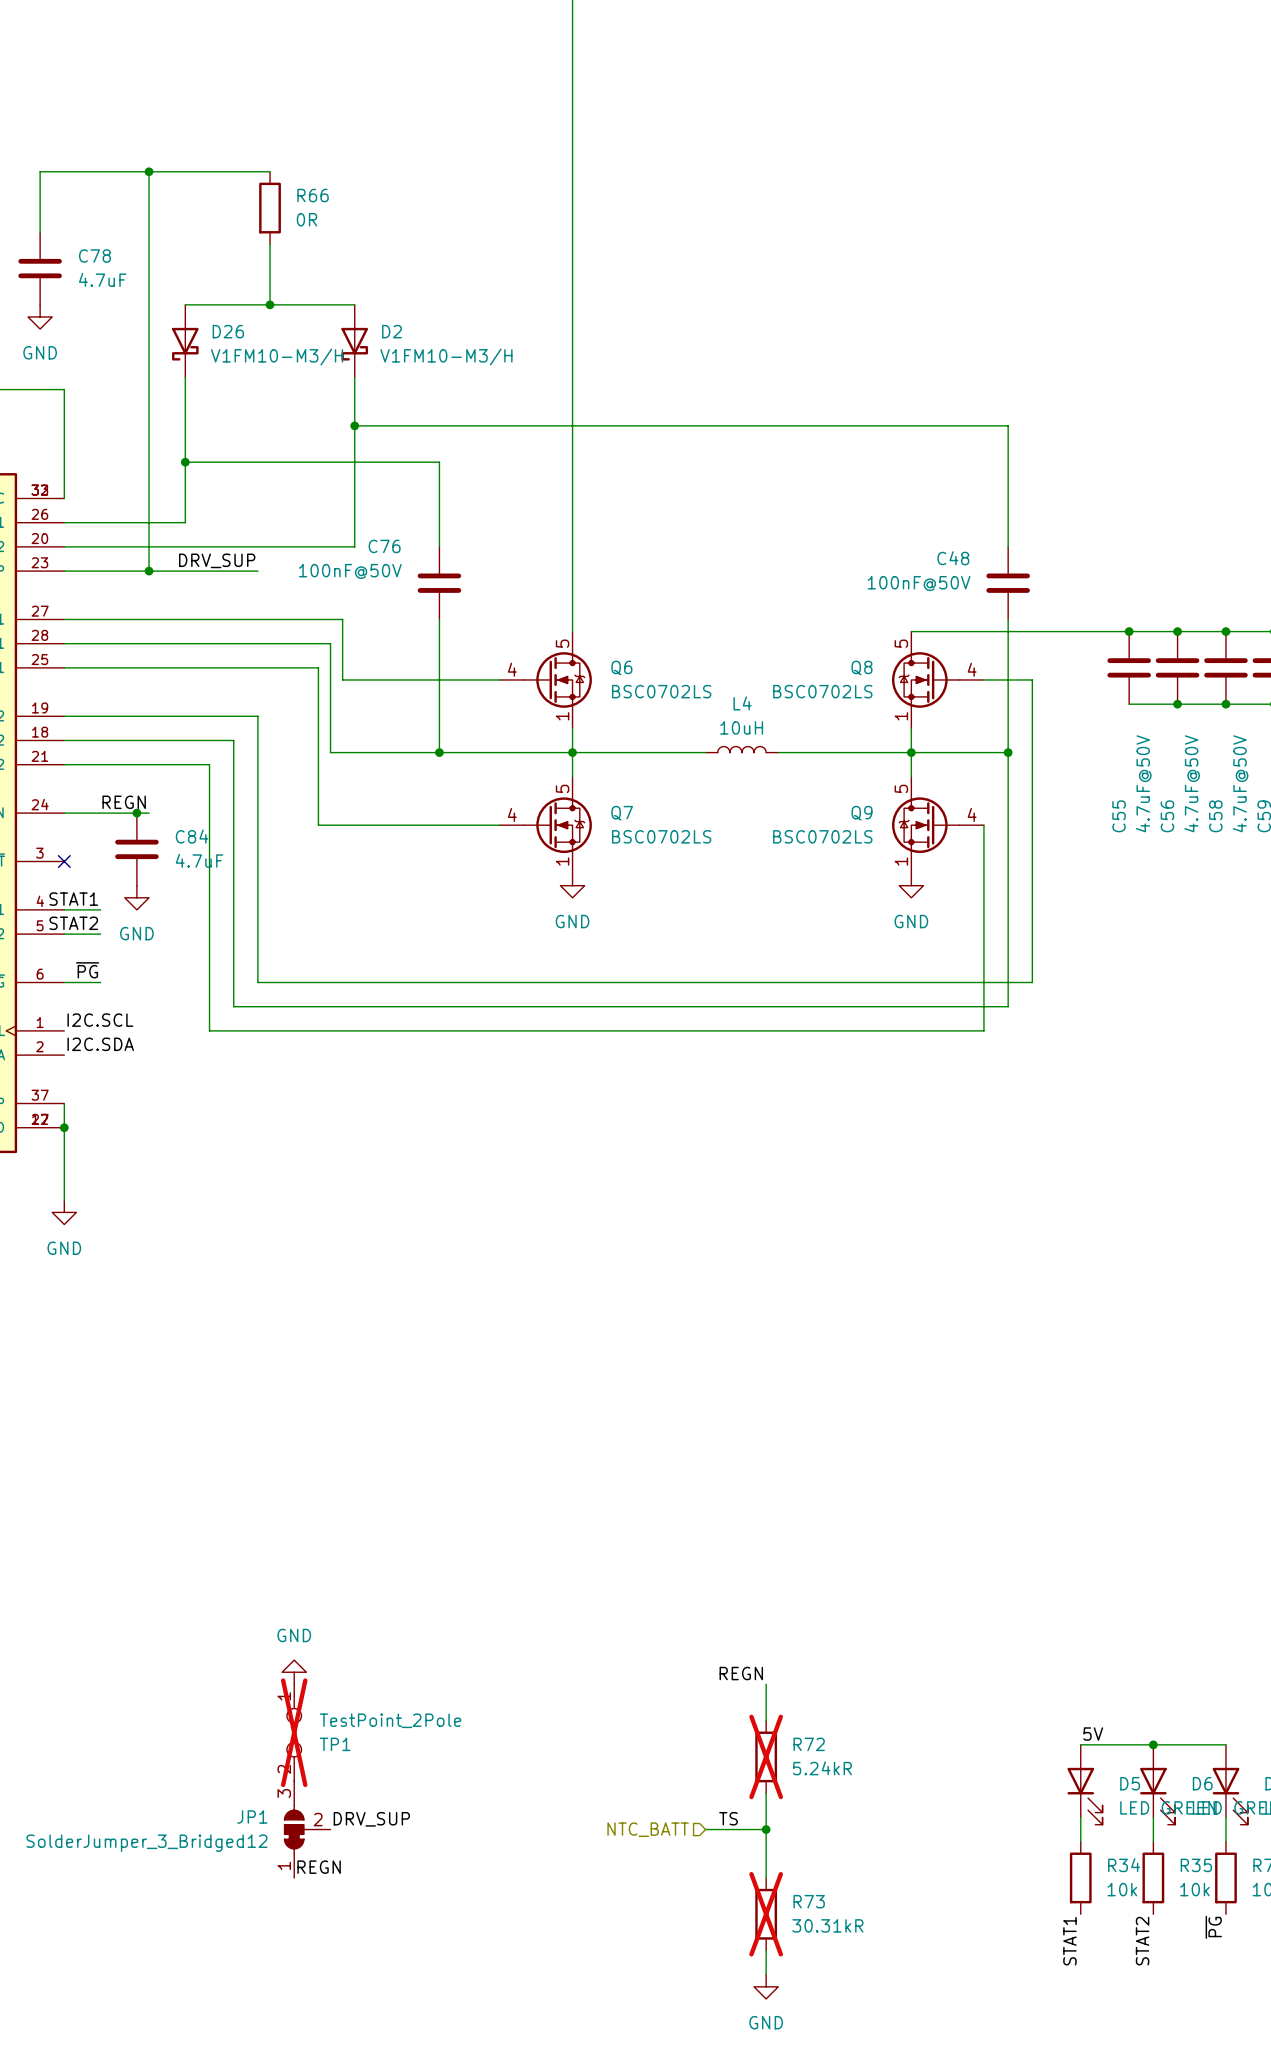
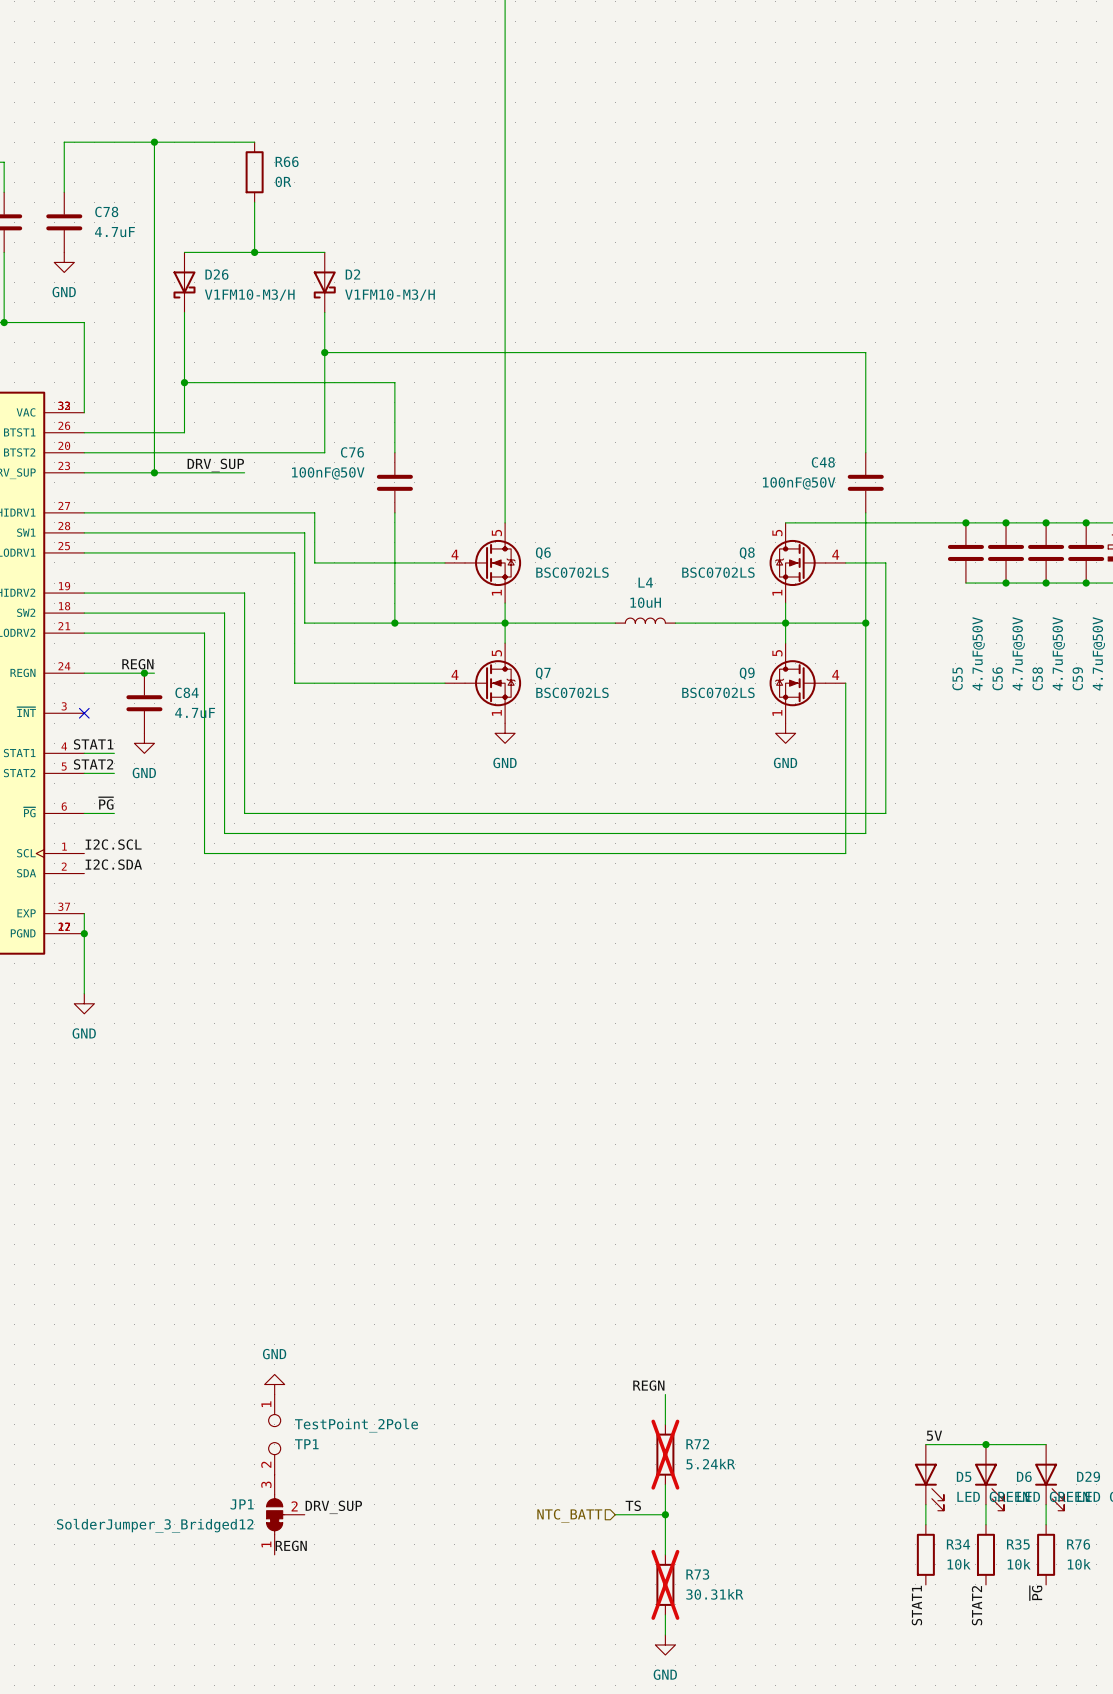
TP1 do-not-place cross: (294, 1732) -> none

